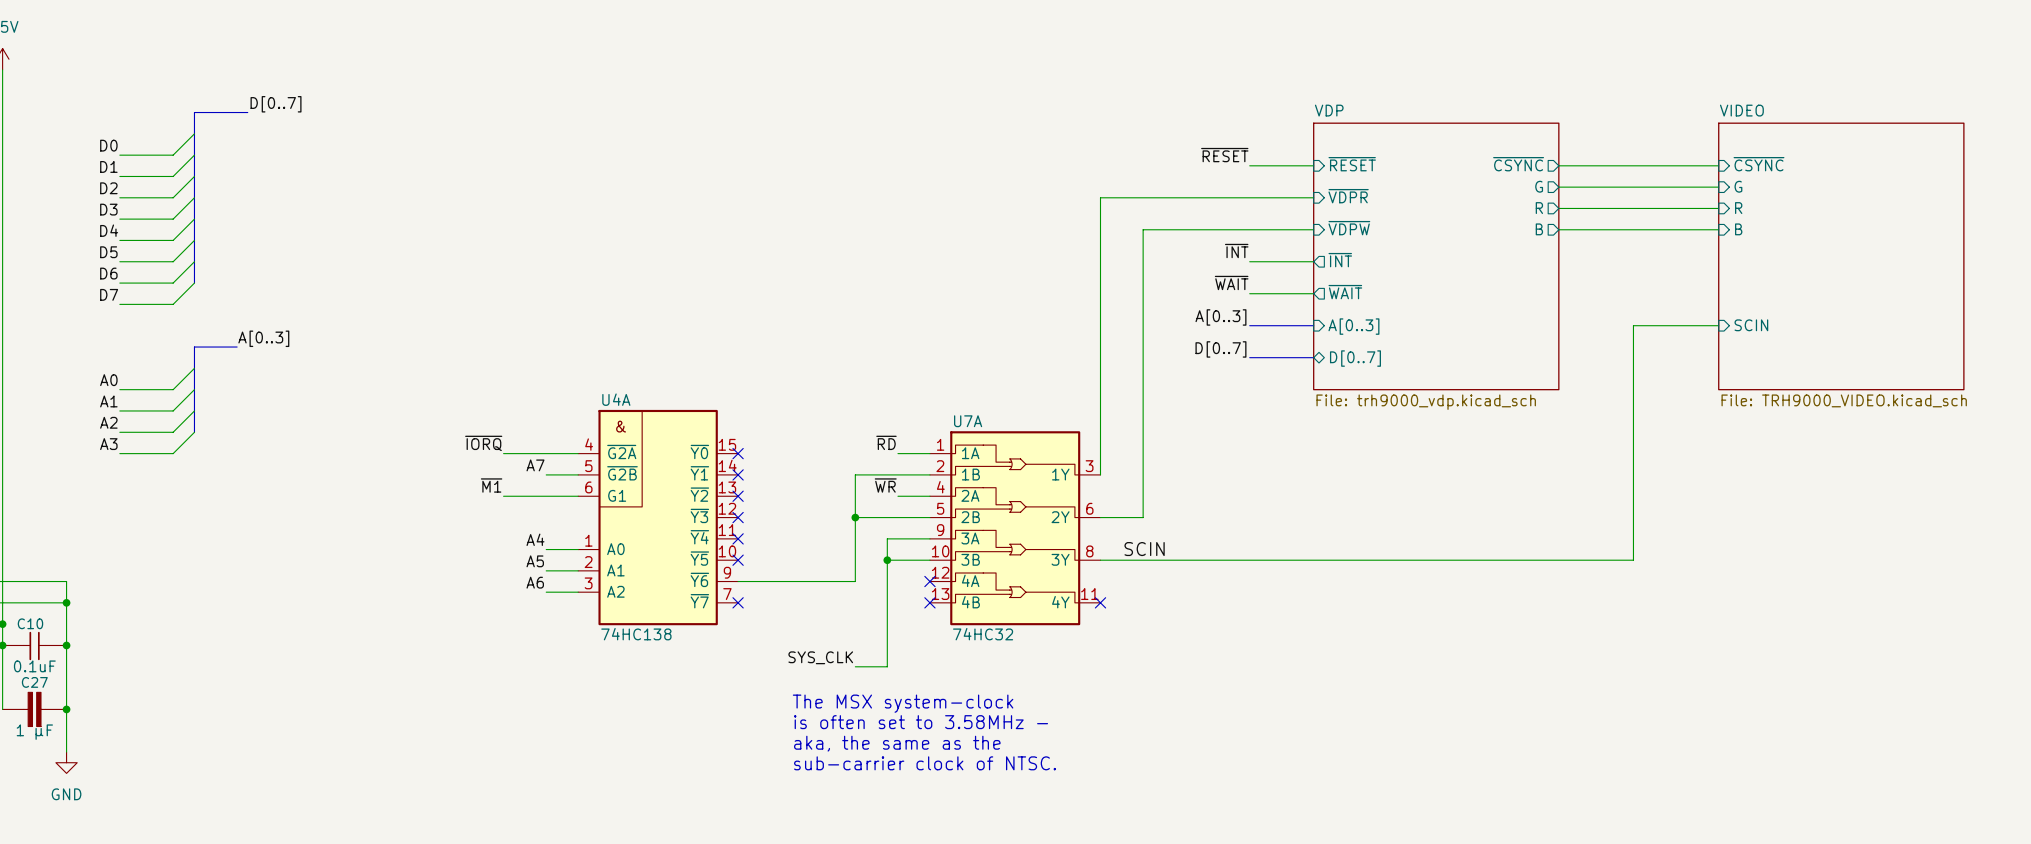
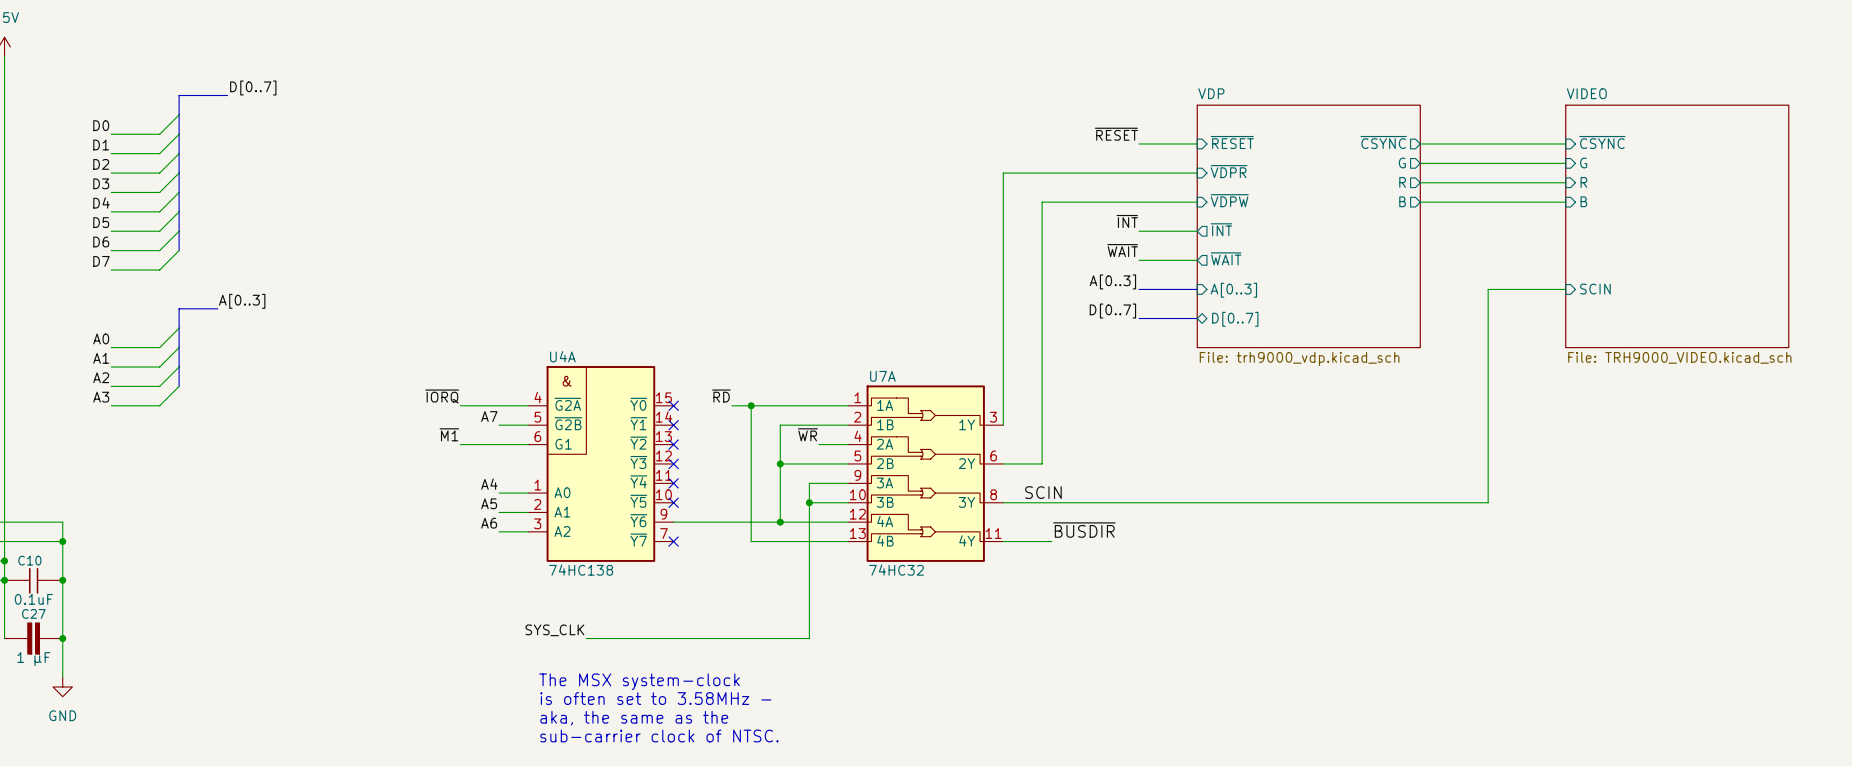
label position: ~{RD} (886, 442) -> ~{RD} (721, 396)
wire: none -> (731, 405) (819, 405)
wire: none -> (751, 405) (751, 541) (848, 541)
junction: none -> (751, 405)
wire: none -> (780, 522) (848, 522)
junction: none -> (780, 522)
no-connect mark: (929, 581) -> none
label: none -> ~{BUSDIR} (1084, 530)
no-connect mark: (929, 602) -> none
wire: none -> (1003, 541) (1051, 541)
no-connect mark: (1100, 602) -> none
label: SYS_CLK (820, 657) -> none
wire: (855, 666) (887, 666) -> (586, 638) (809, 638) (809, 599)
label: none -> SYS_CLK (554, 630)
text position: The MSX system-clock (903, 703) -> The MSX system-clock (639, 681)
text position: is often set to 3.58MHz - (921, 722) -> is often set to 3.58MHz - (655, 698)
text position: aka, the same as the (897, 743) -> aka, the same as the (634, 718)
text position: sub-carrier clock of NTSC. (925, 763) -> sub-carrier clock of NTSC. (659, 736)

